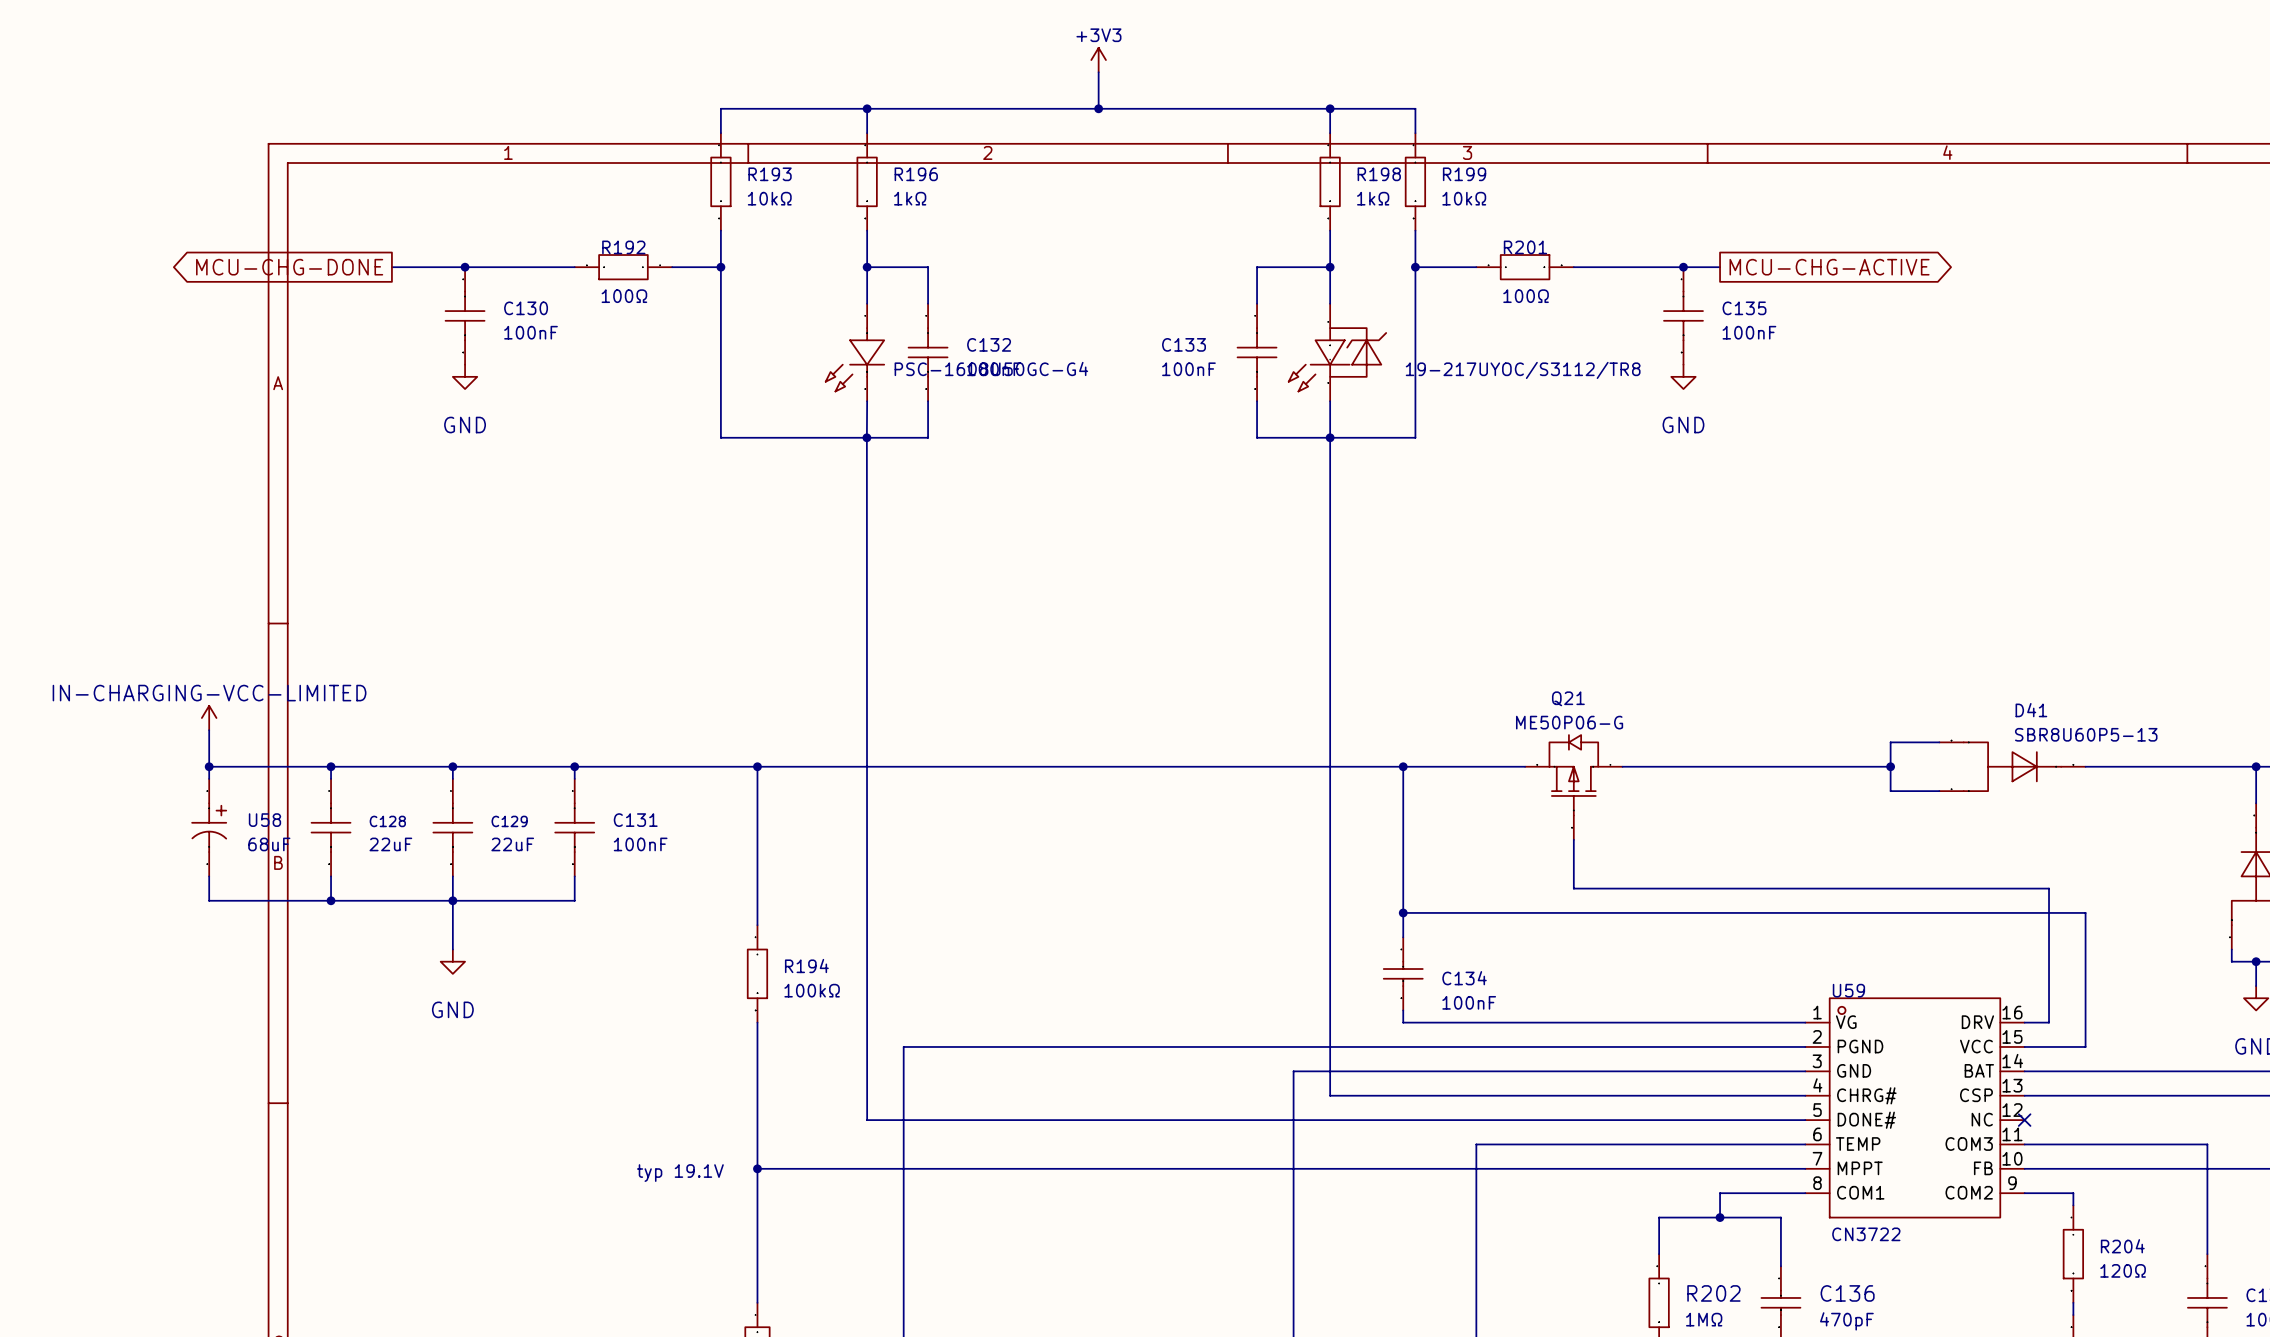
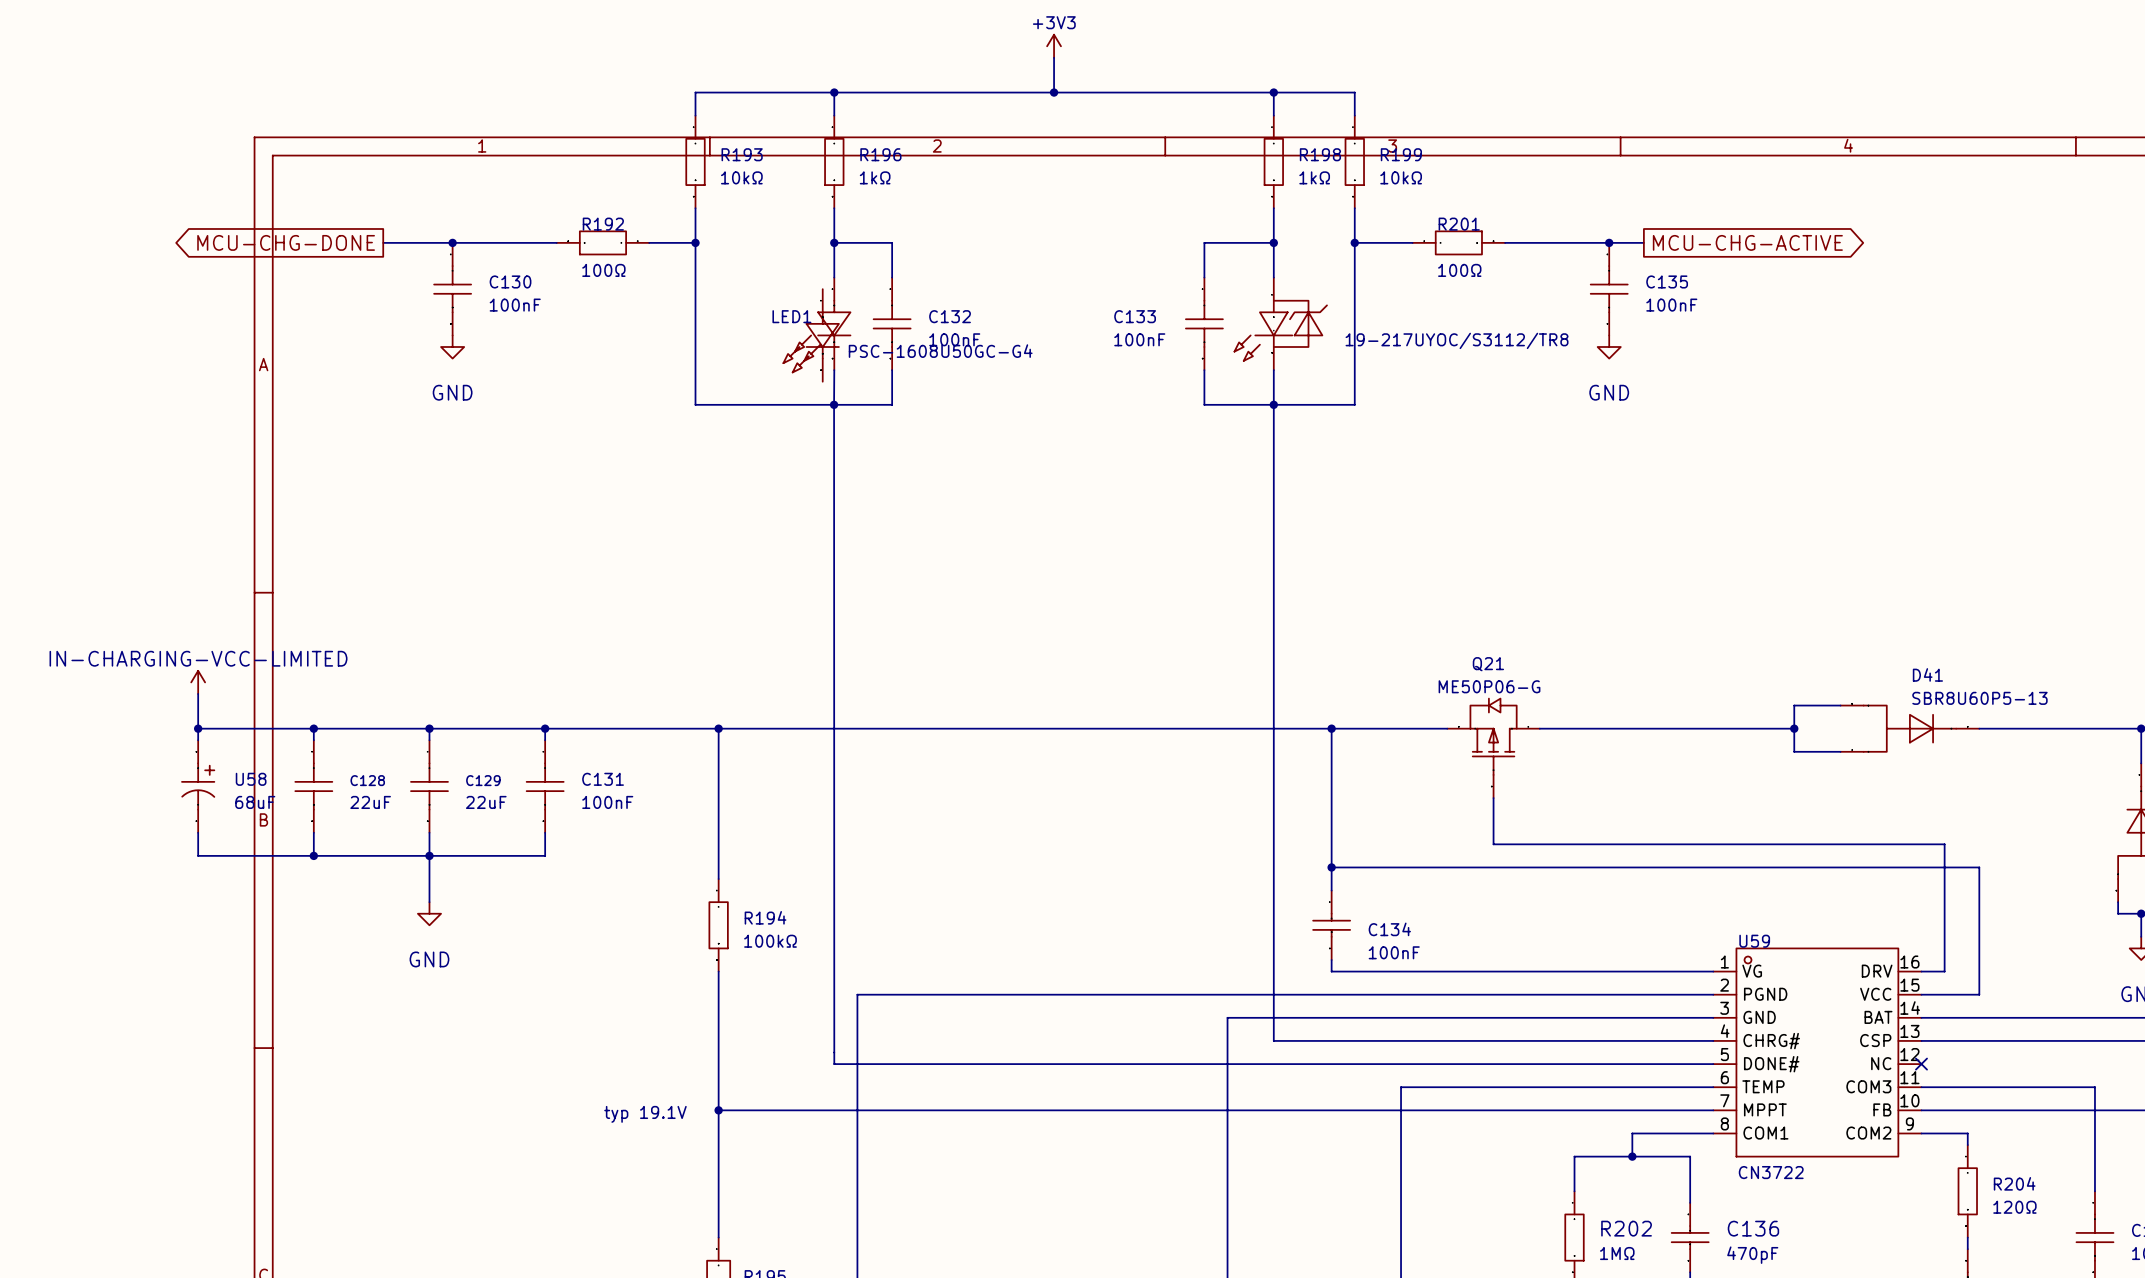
power symbol position: +3V3 (1098, 60) -> +3V3 (1054, 46)
wire: (1098, 72) (1098, 108) -> (1054, 57) (1054, 92)
wire: (867, 108) (867, 133) -> (834, 92) (834, 115)
junction position: (867, 108) -> (834, 92)
junction position: (1098, 108) -> (1054, 92)
wire: (1330, 108) (1330, 133) -> (1273, 92) (1273, 115)
junction position: (1330, 108) -> (1273, 92)
wire: (720, 133) (720, 108) (1415, 108) (1415, 133) -> (695, 115) (695, 92) (1354, 92) (1354, 115)
R193 position: (720, 181) -> (695, 161)
R196 position: (867, 181) -> (834, 161)
R198 position: (1330, 181) -> (1273, 161)
R199 position: (1415, 181) -> (1354, 161)
wire: (720, 230) (720, 437) (928, 437) (928, 401) -> (695, 208) (695, 404) (892, 404) (892, 370)
wire: (867, 230) (867, 303) -> (834, 208) (834, 277)
wire: (1330, 230) (1330, 303) -> (1273, 208) (1273, 277)
wire: (1415, 230) (1415, 437) (1257, 437) (1257, 401) -> (1354, 208) (1354, 404) (1204, 404) (1204, 370)
global label position: MCU-CHG-DONE (289, 267) -> MCU-CHG-DONE (286, 242)
wire: (391, 267) (574, 267) -> (383, 242) (556, 242)
junction position: (465, 267) -> (452, 242)
R192 position: (623, 267) -> (602, 242)
wire: (672, 267) (720, 267) -> (649, 242) (695, 242)
junction position: (720, 267) -> (695, 242)
wire: (867, 267) (928, 267) (928, 303) -> (834, 242) (892, 242) (892, 277)
junction position: (867, 267) -> (834, 242)
wire: (1330, 267) (1257, 267) (1257, 303) -> (1273, 242) (1204, 242) (1204, 277)
junction position: (1330, 267) -> (1273, 242)
wire: (1415, 267) (1476, 267) -> (1354, 242) (1412, 242)
junction position: (1415, 267) -> (1354, 242)
R201 position: (1525, 267) -> (1458, 242)
wire: (1573, 267) (1720, 267) -> (1505, 242) (1643, 242)
junction position: (1683, 267) -> (1609, 242)
global label position: MCU-CHG-ACTIVE (1829, 267) -> MCU-CHG-ACTIVE (1747, 242)
C130 position: (465, 315) -> (452, 289)
C135 position: (1683, 315) -> (1609, 289)
LED1: none -> (822, 323)
C132 position: (928, 352) -> (892, 323)
C133 position: (1257, 352) -> (1204, 323)
part position: (1337, 352) -> (1280, 323)
power symbol position: GND (465, 376) -> GND (452, 347)
power symbol position: GND (1683, 376) -> GND (1609, 347)
wire: (867, 401) (867, 1120) (879, 1120) -> (834, 370) (834, 1064)
wire: (1330, 401) (1330, 1095) (1342, 1095) -> (1273, 370) (1273, 1040)
junction position: (866, 437) -> (834, 404)
junction position: (1330, 437) -> (1273, 404)

